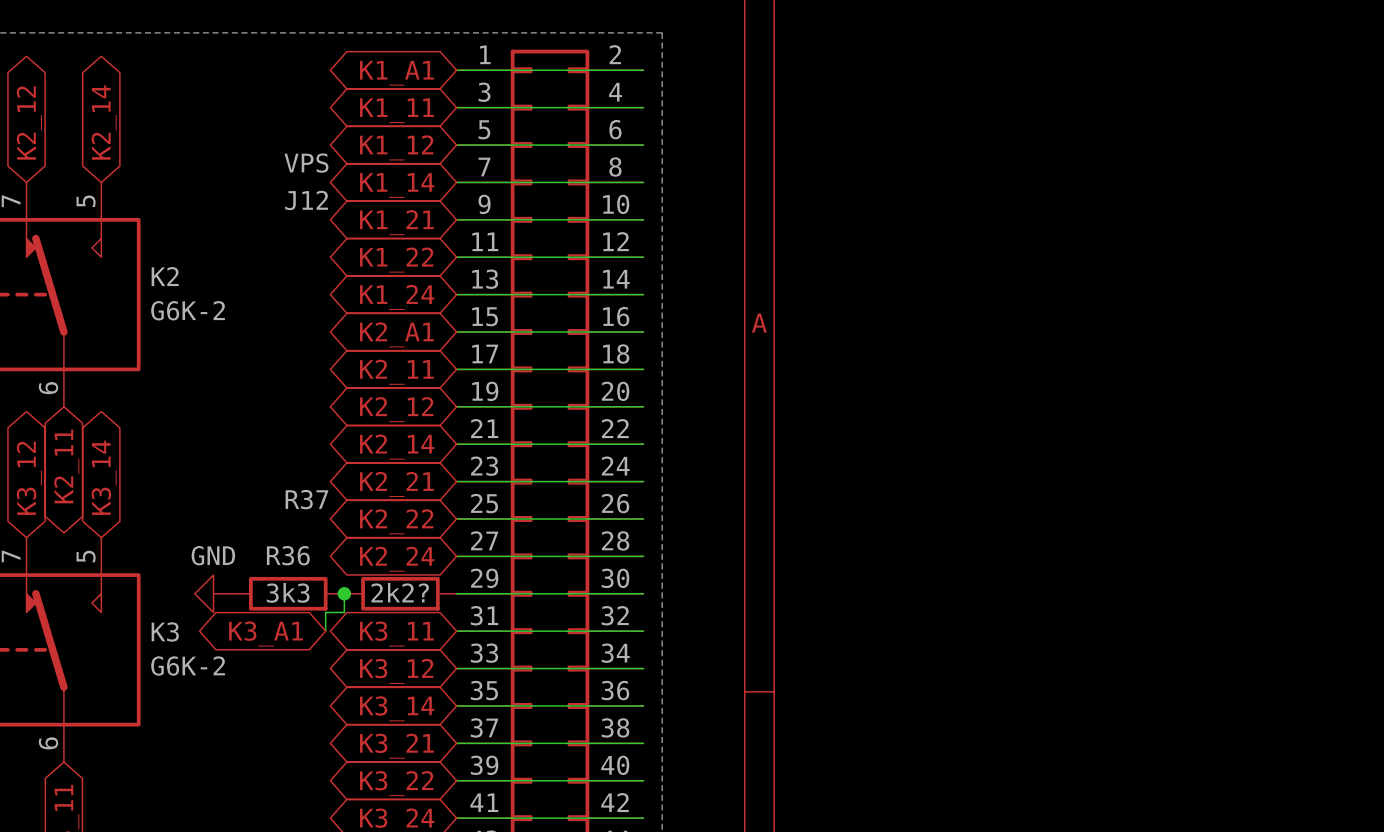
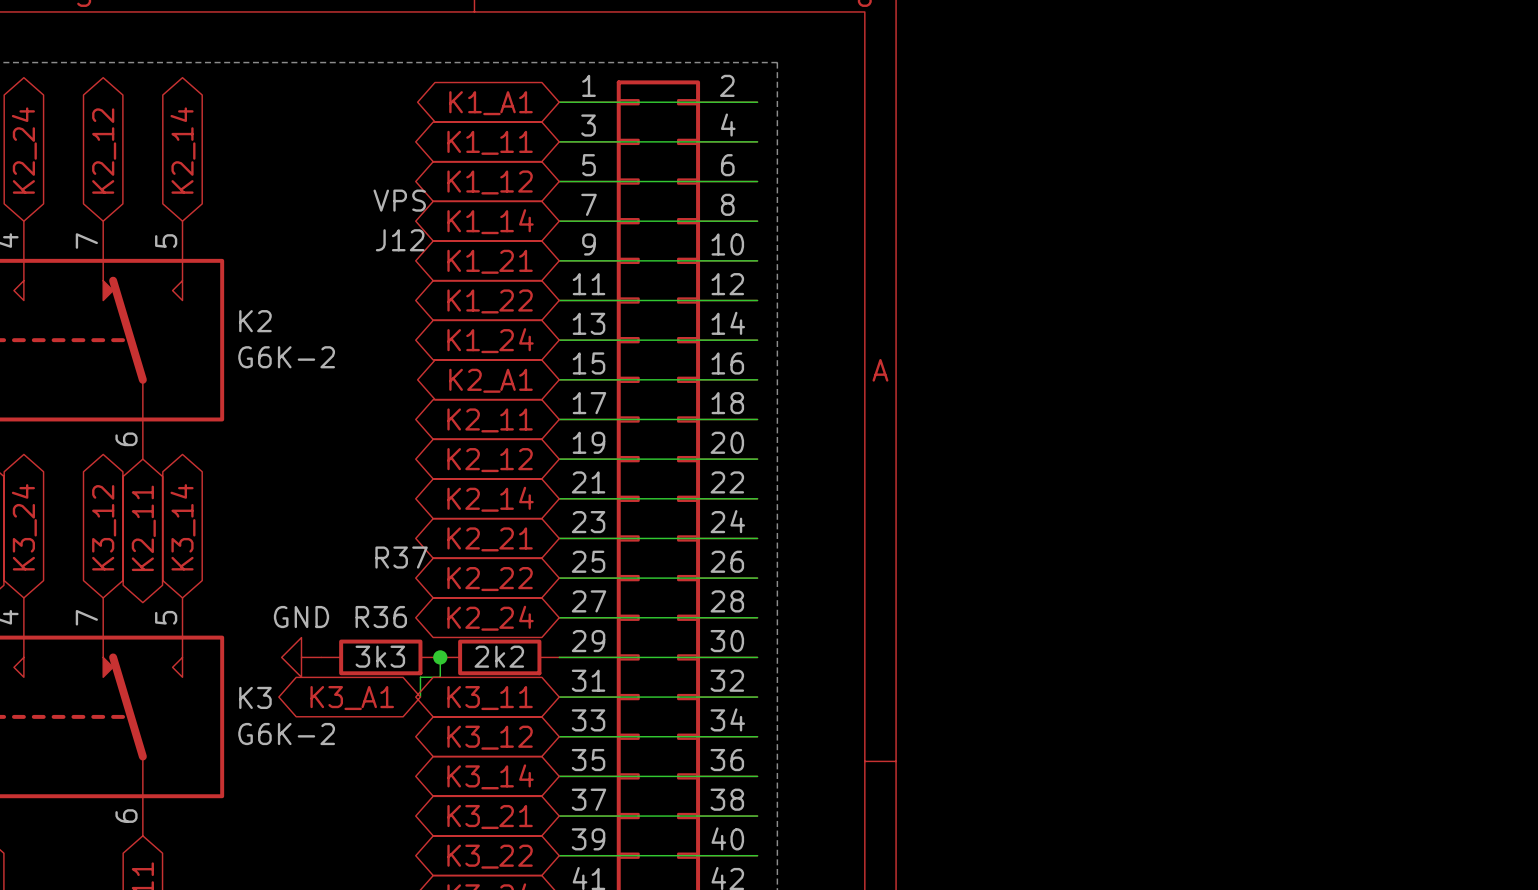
R37 value: 2k2? (400, 592) -> 2k2 (499, 656)

